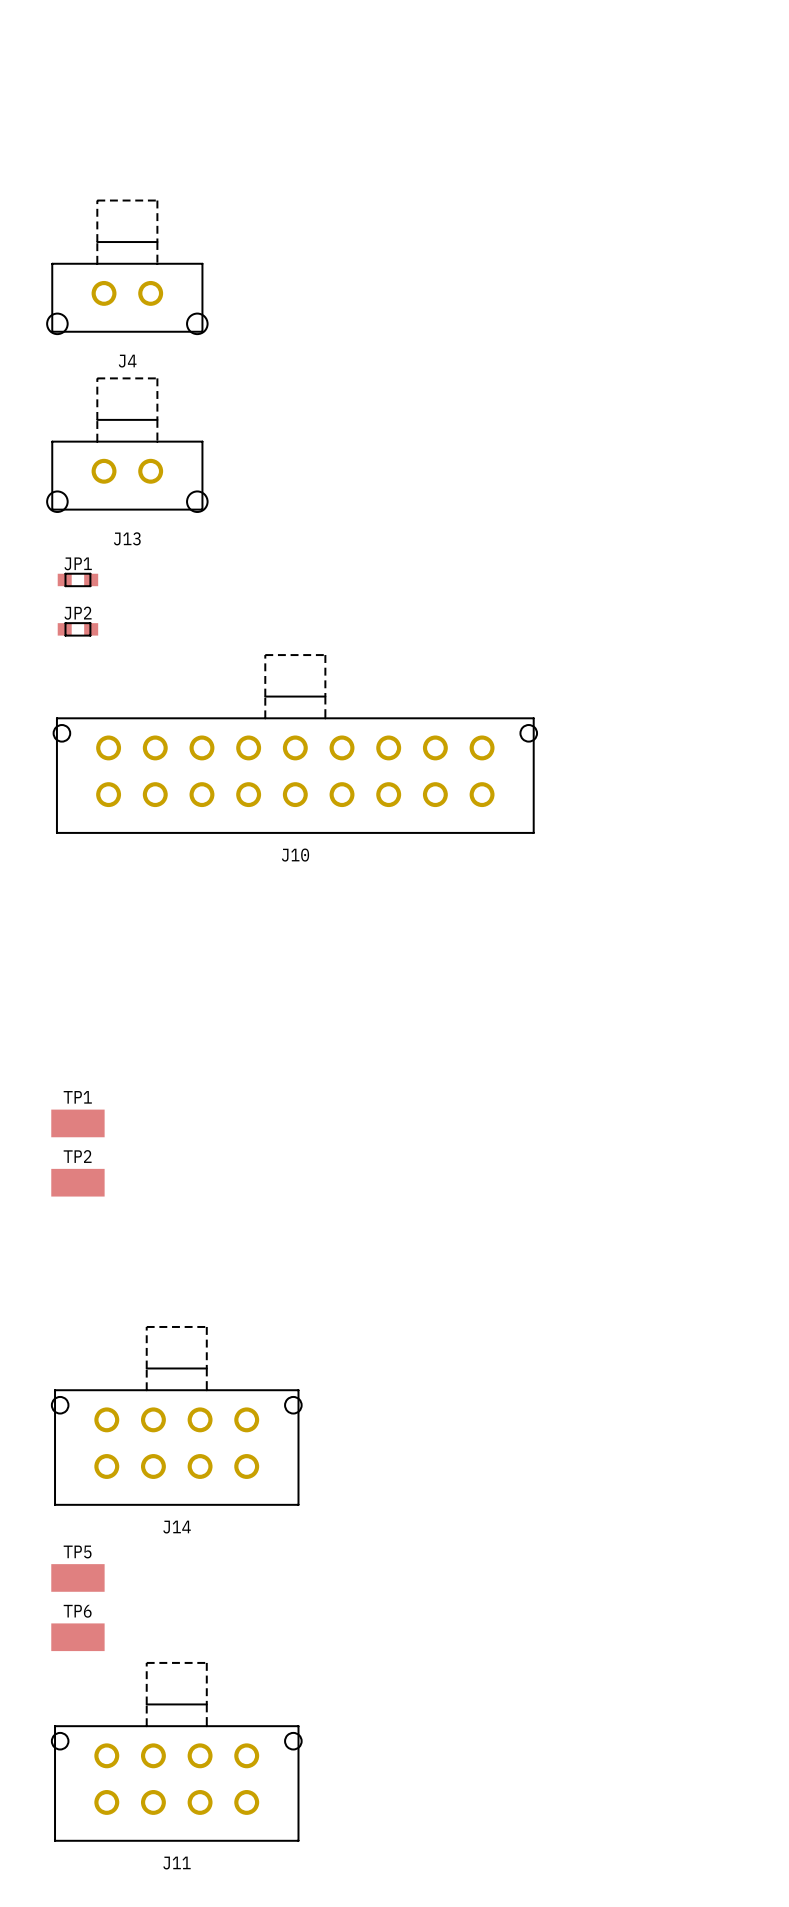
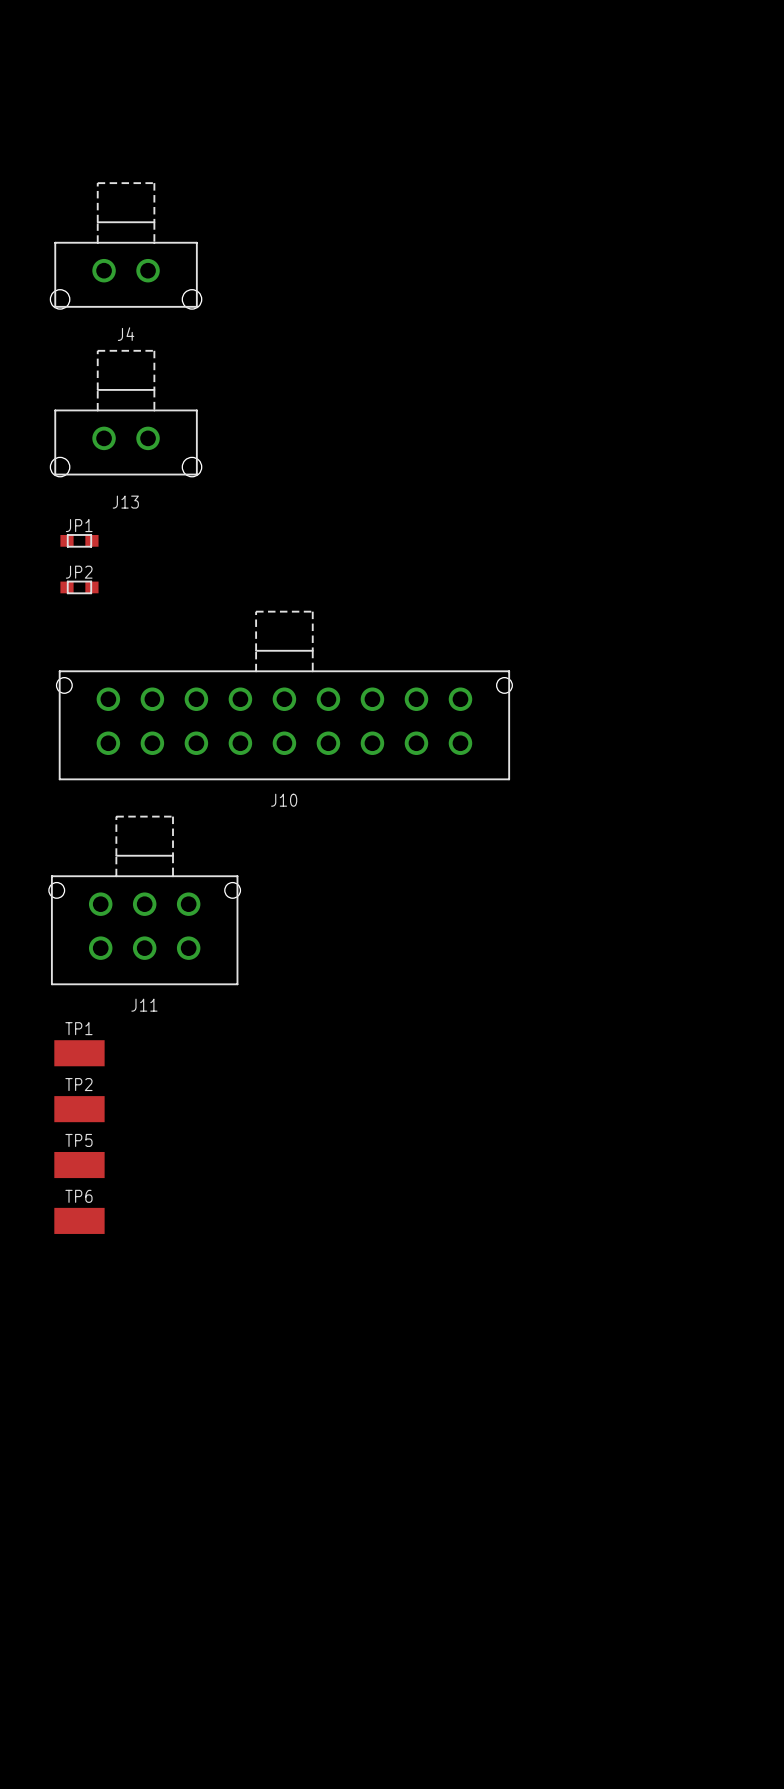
J14: (176, 1415) -> none
TP5 position: (77, 1577) -> (79, 1165)
TP6 position: (77, 1637) -> (79, 1220)
J11 footprint: [51, 1661, 302, 1842] -> [48, 815, 241, 986]

